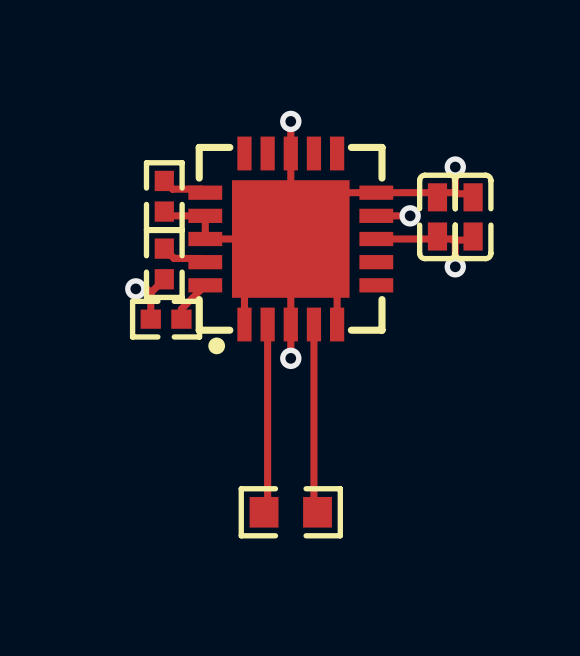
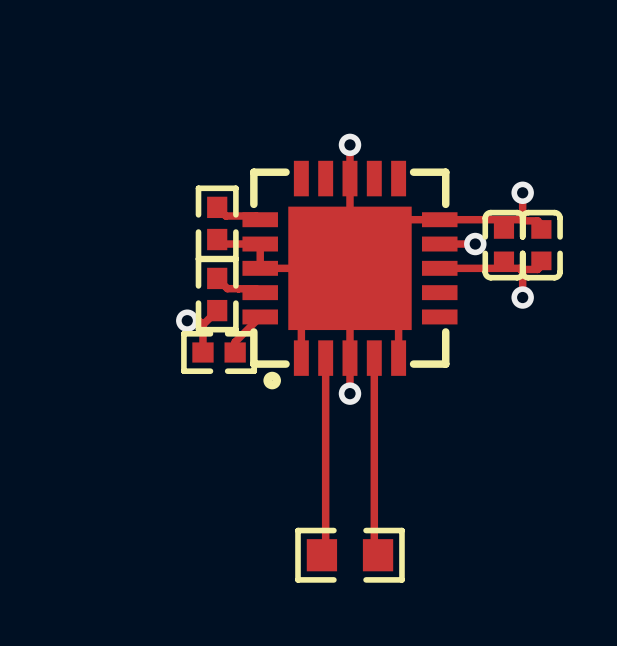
part footprint: [416, 172, 458, 262] -> [482, 209, 526, 281]
part footprint: [452, 172, 494, 262] -> [519, 209, 563, 281]

